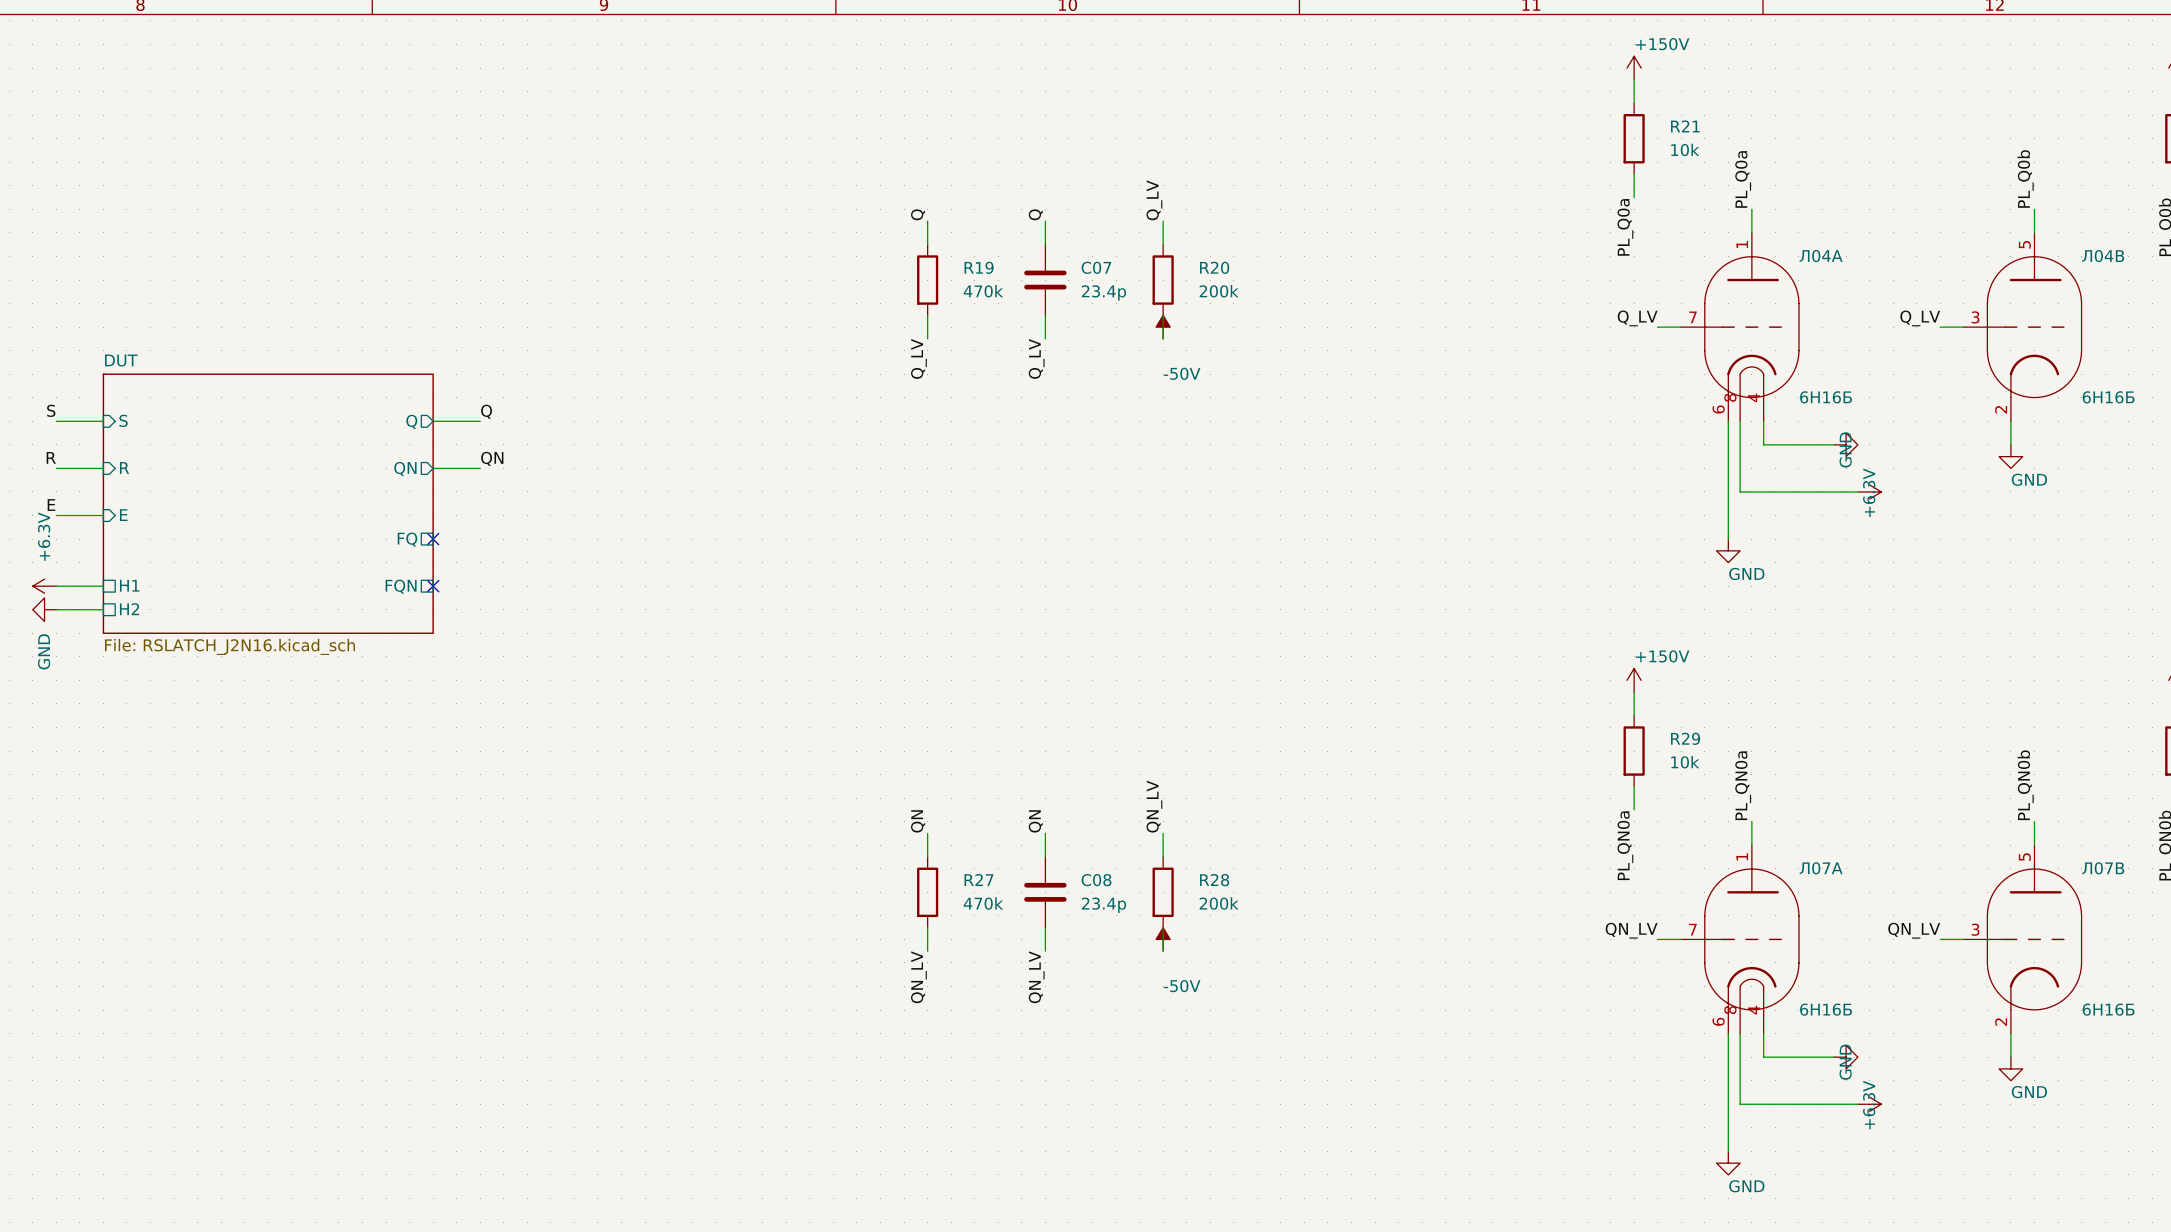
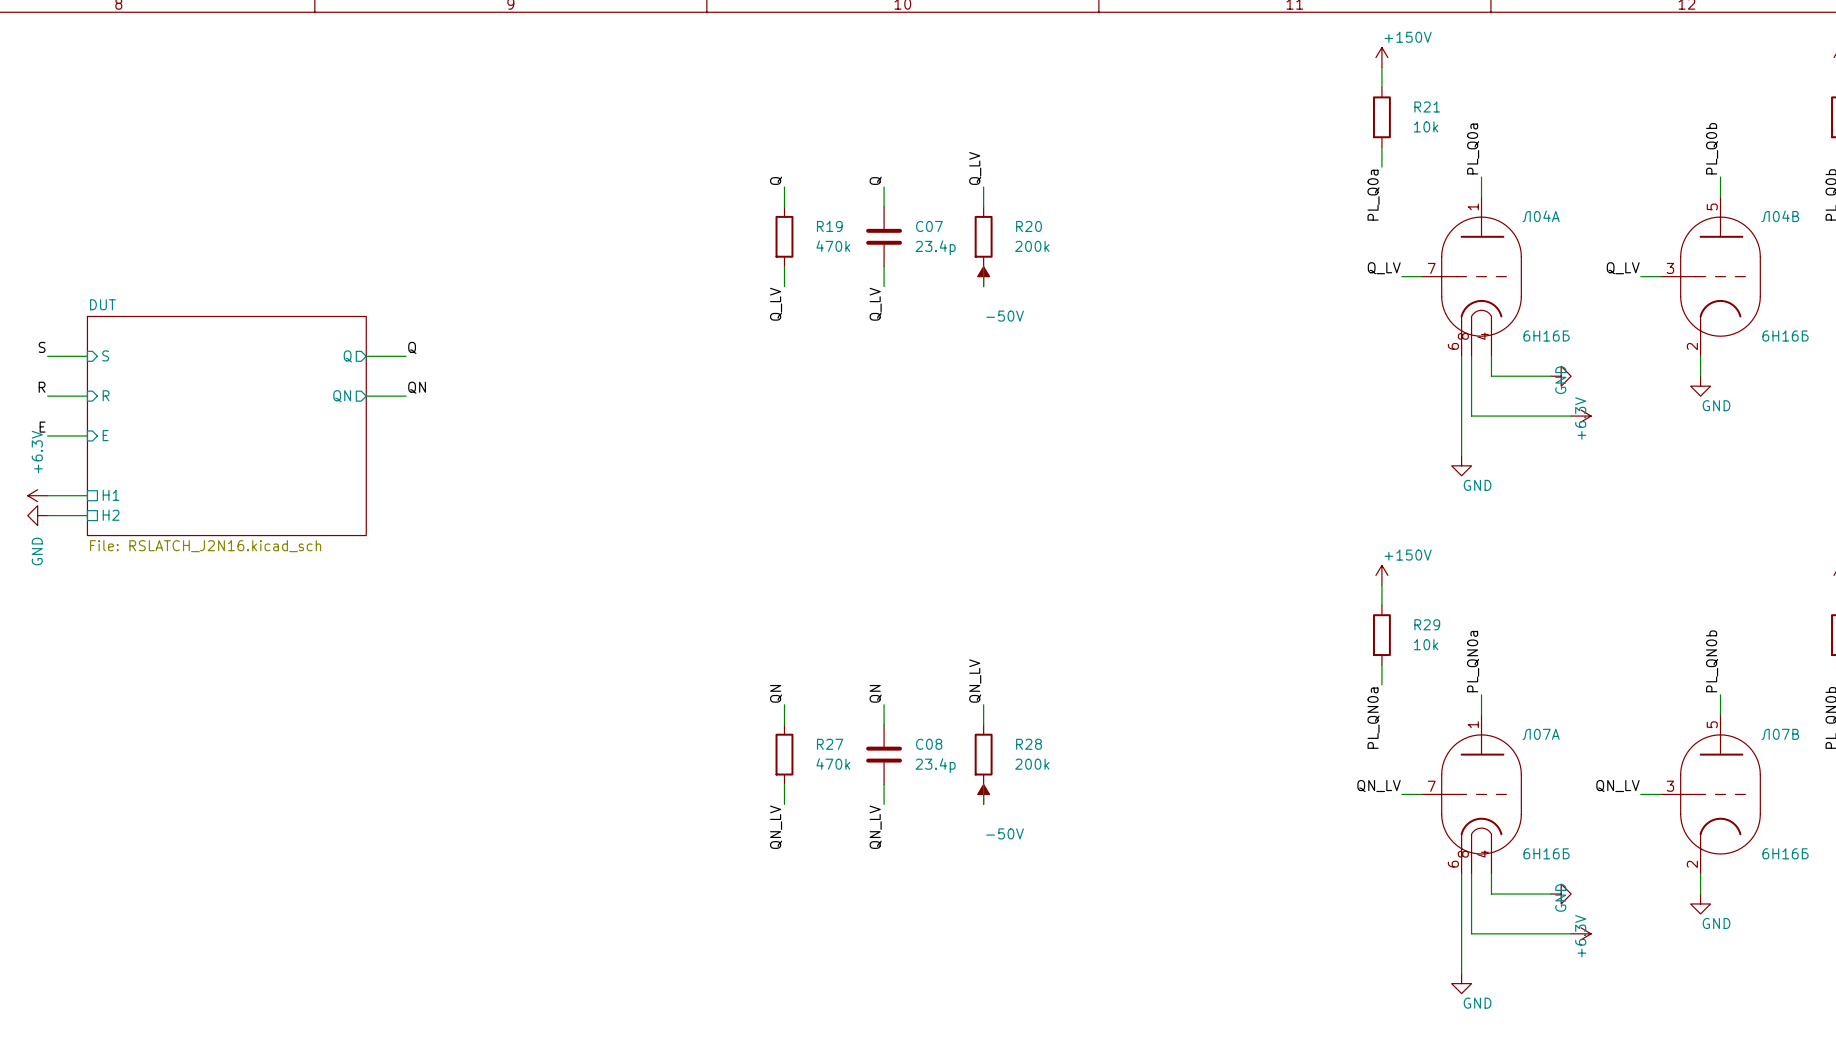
sheet pin: FQ (407, 539) -> none
no-connect mark: (433, 539) -> none
sheet pin: FQN (401, 586) -> none
no-connect mark: (433, 586) -> none

